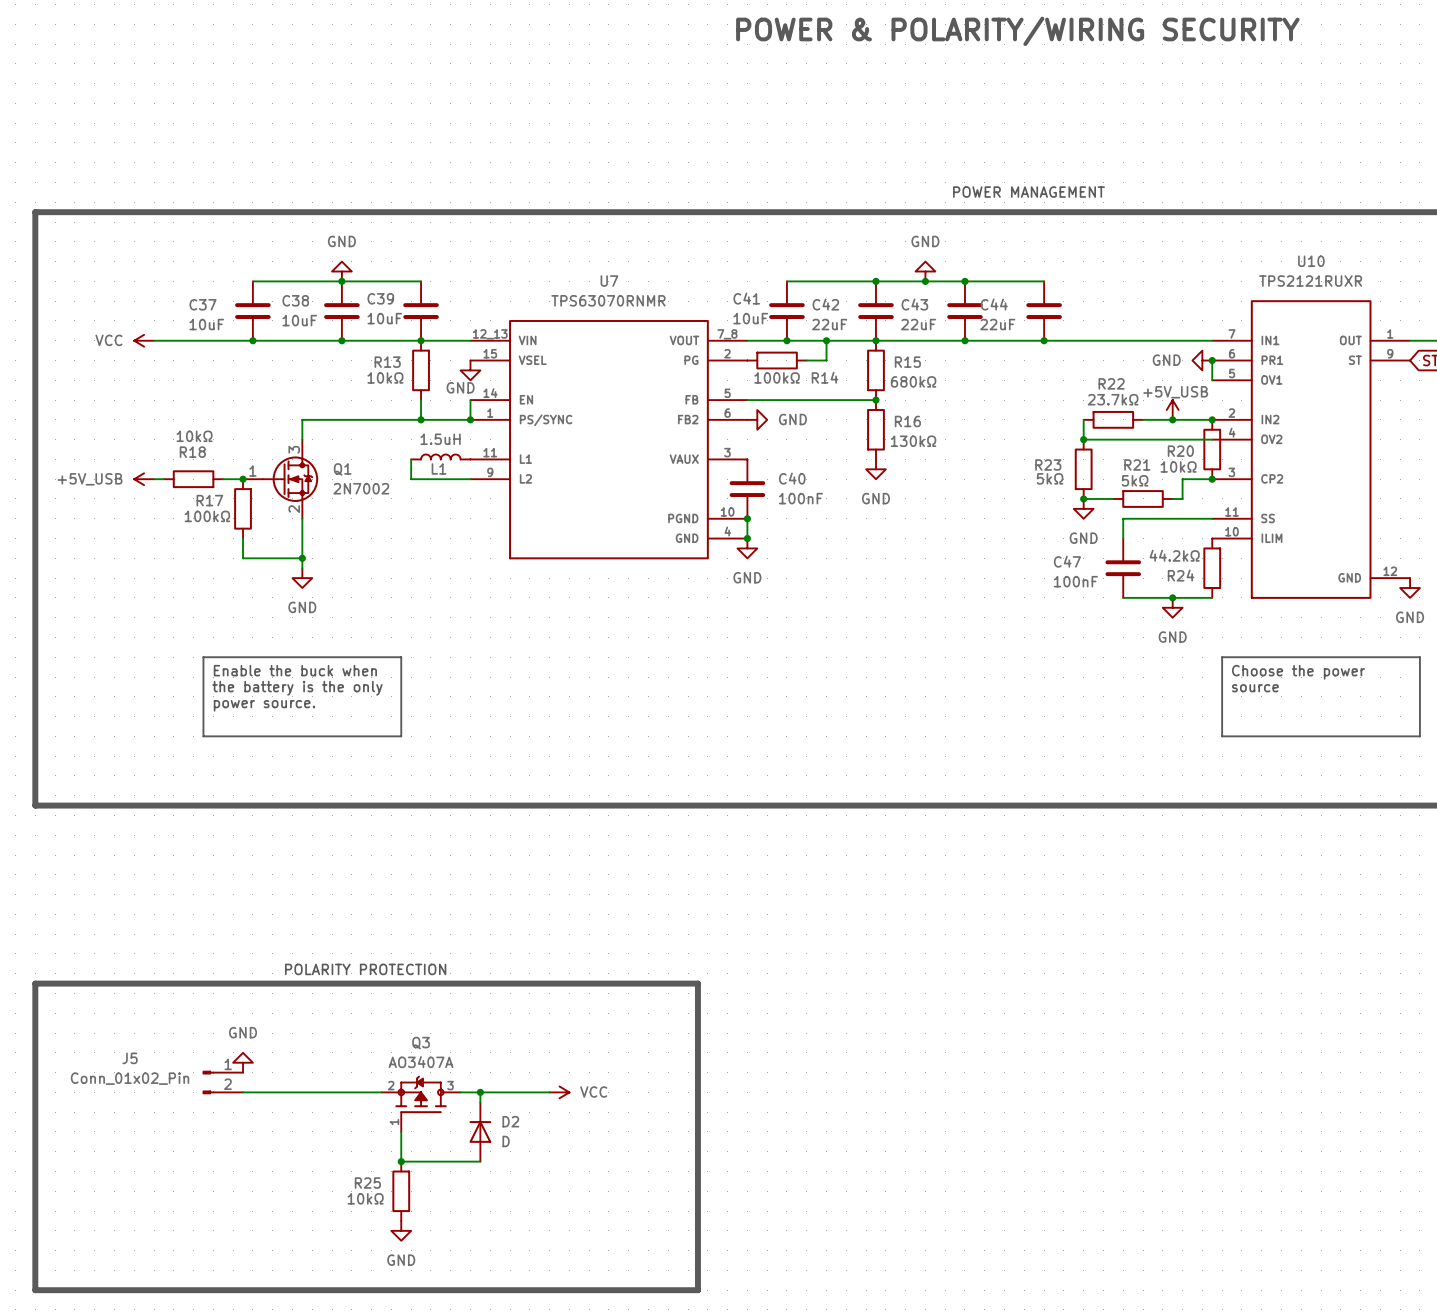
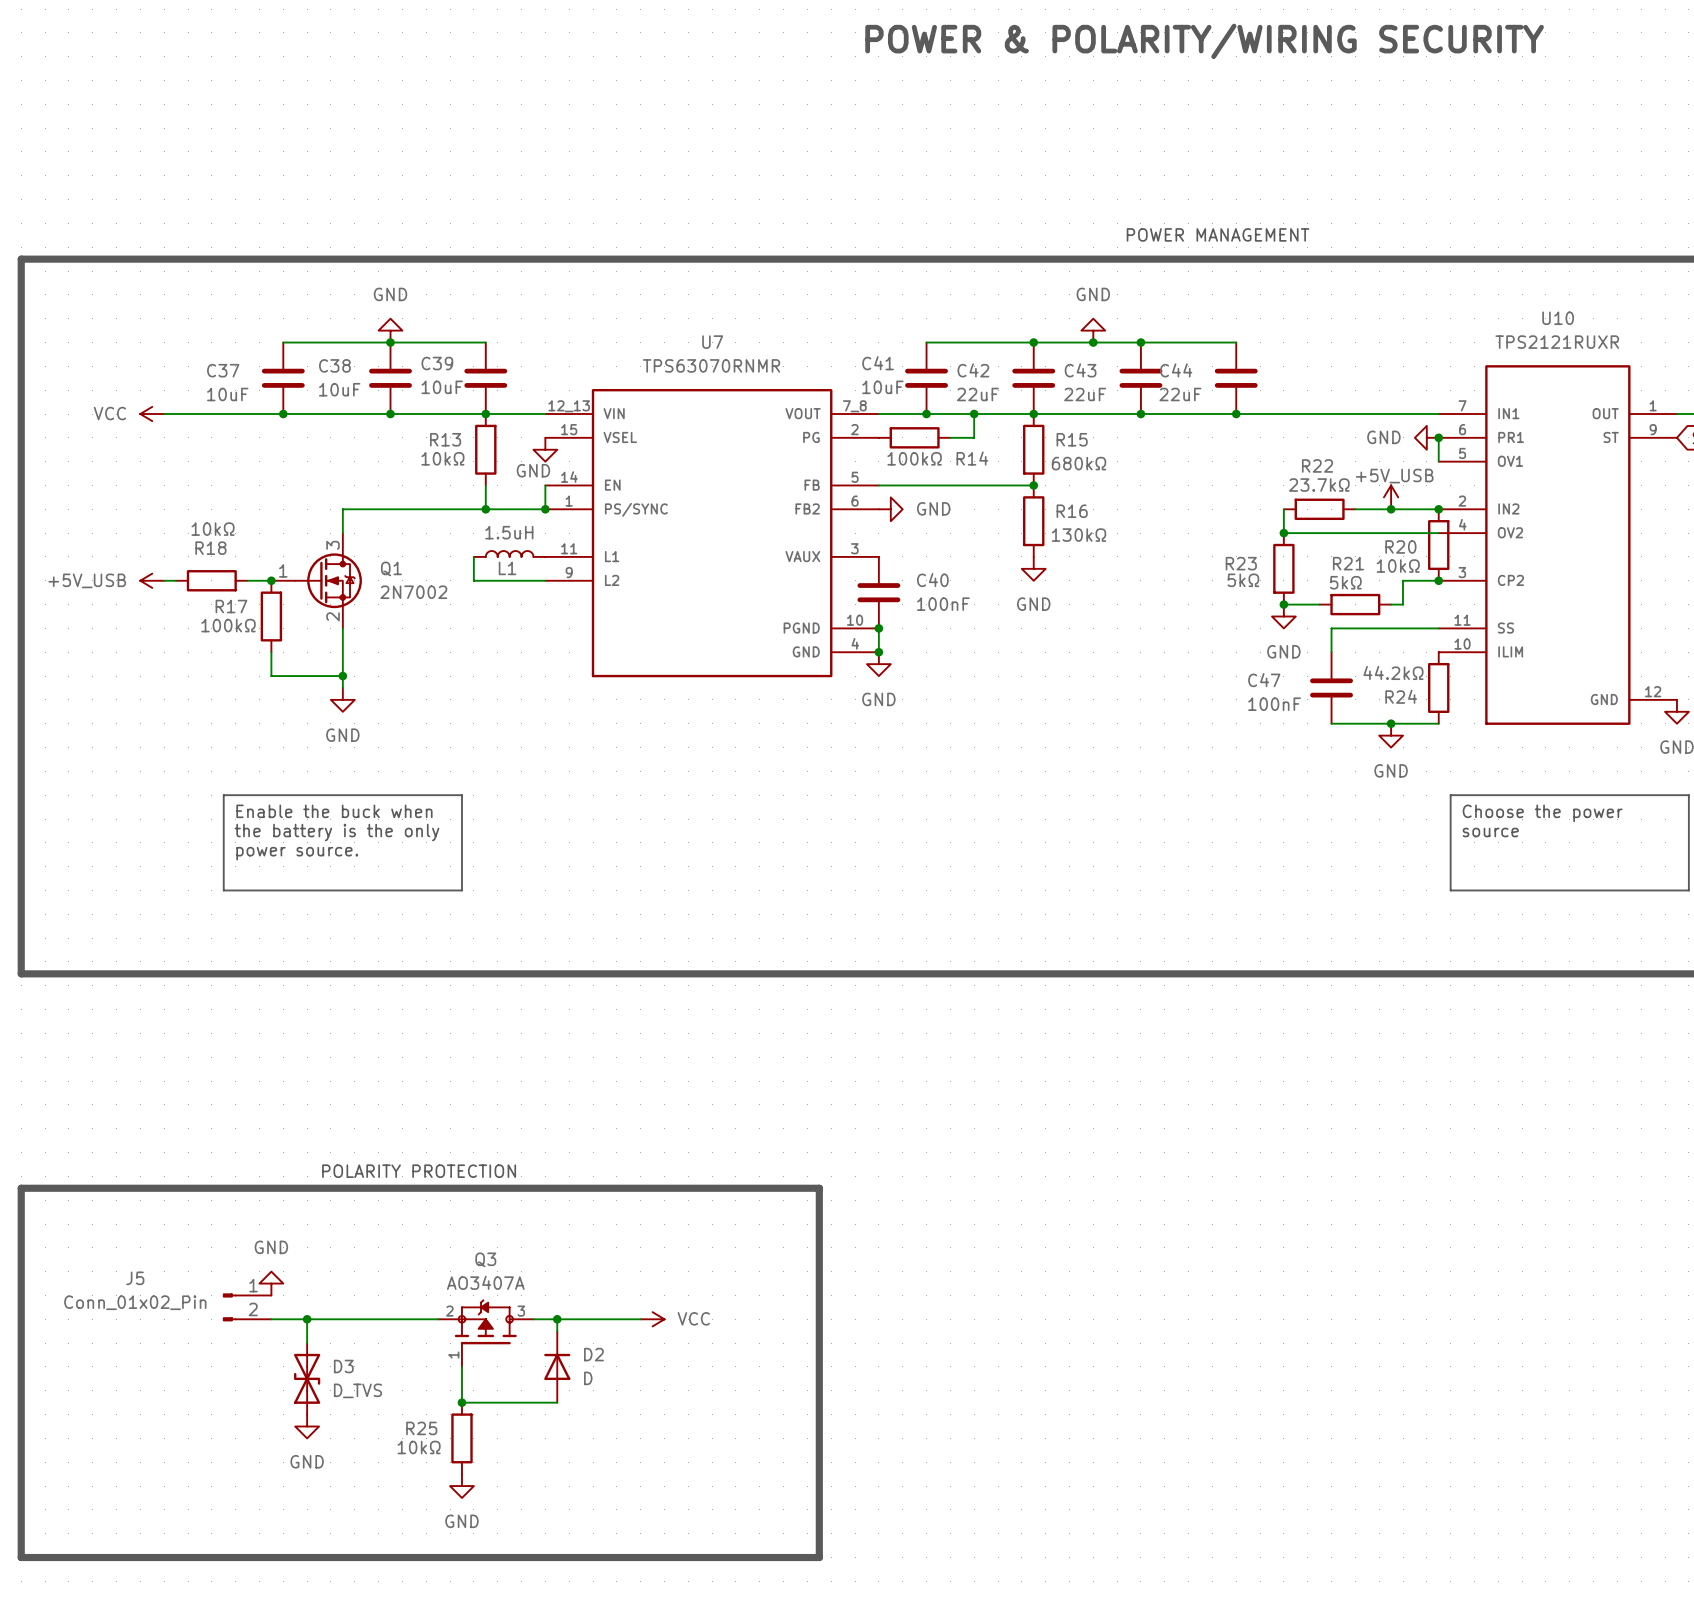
wire: none -> (307, 1319) (307, 1343)
junction: none -> (307, 1319)
D3: none -> D_TVS (307, 1378)
power symbol: none -> GND (307, 1426)

